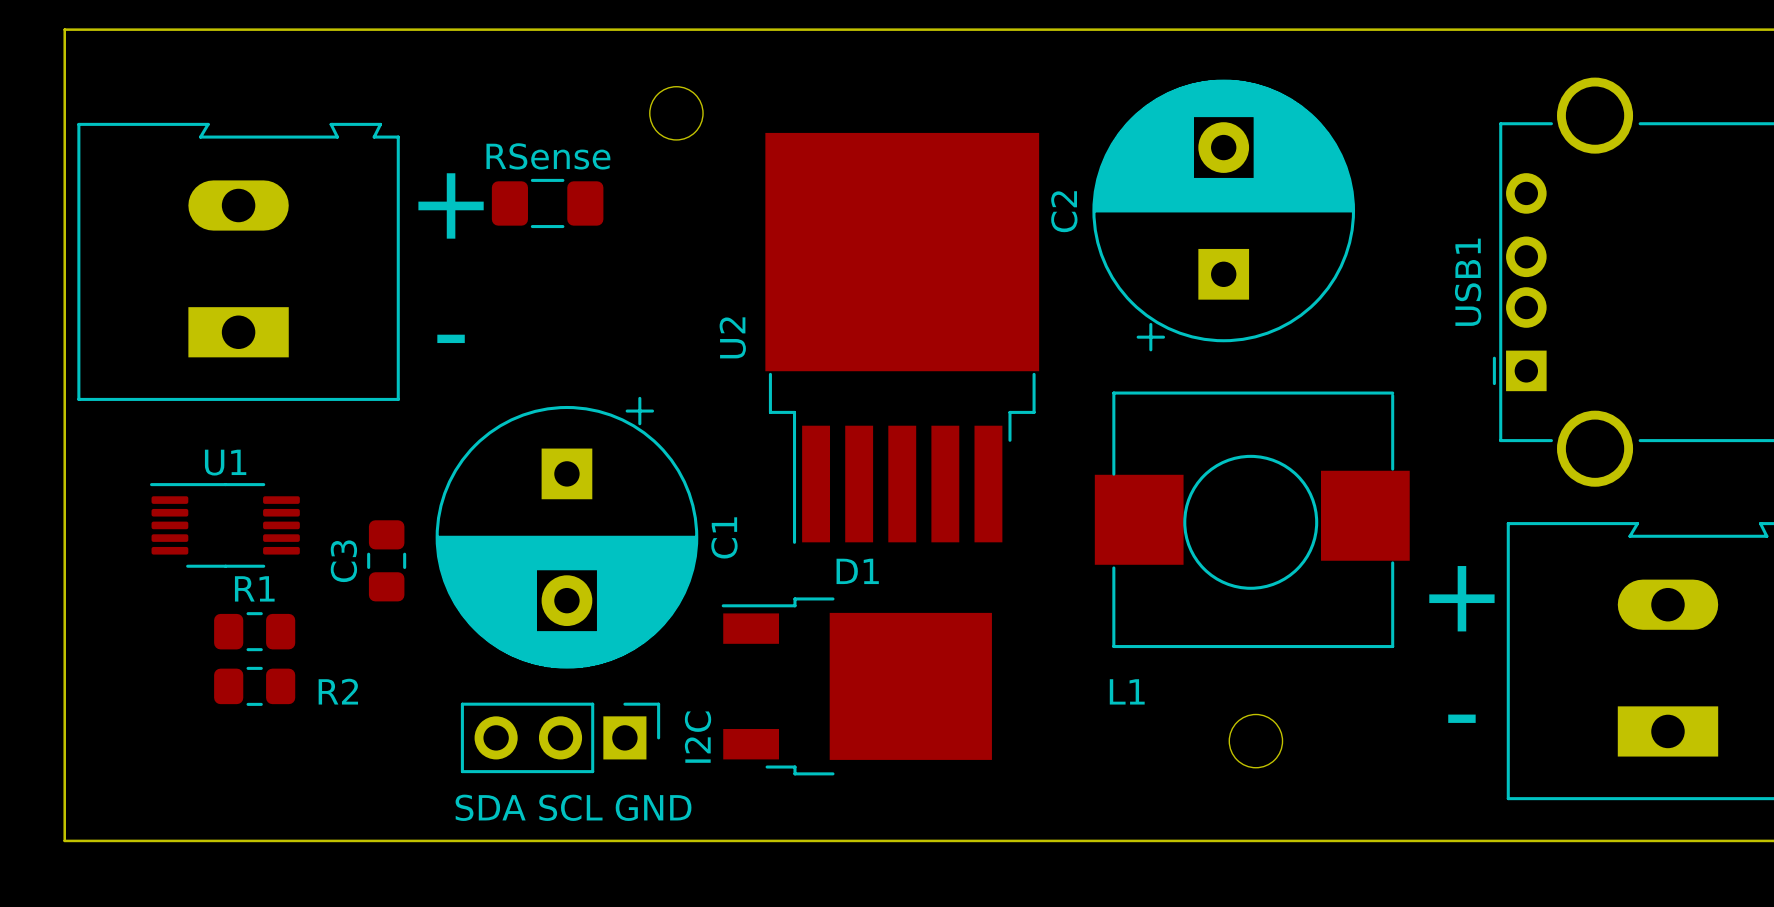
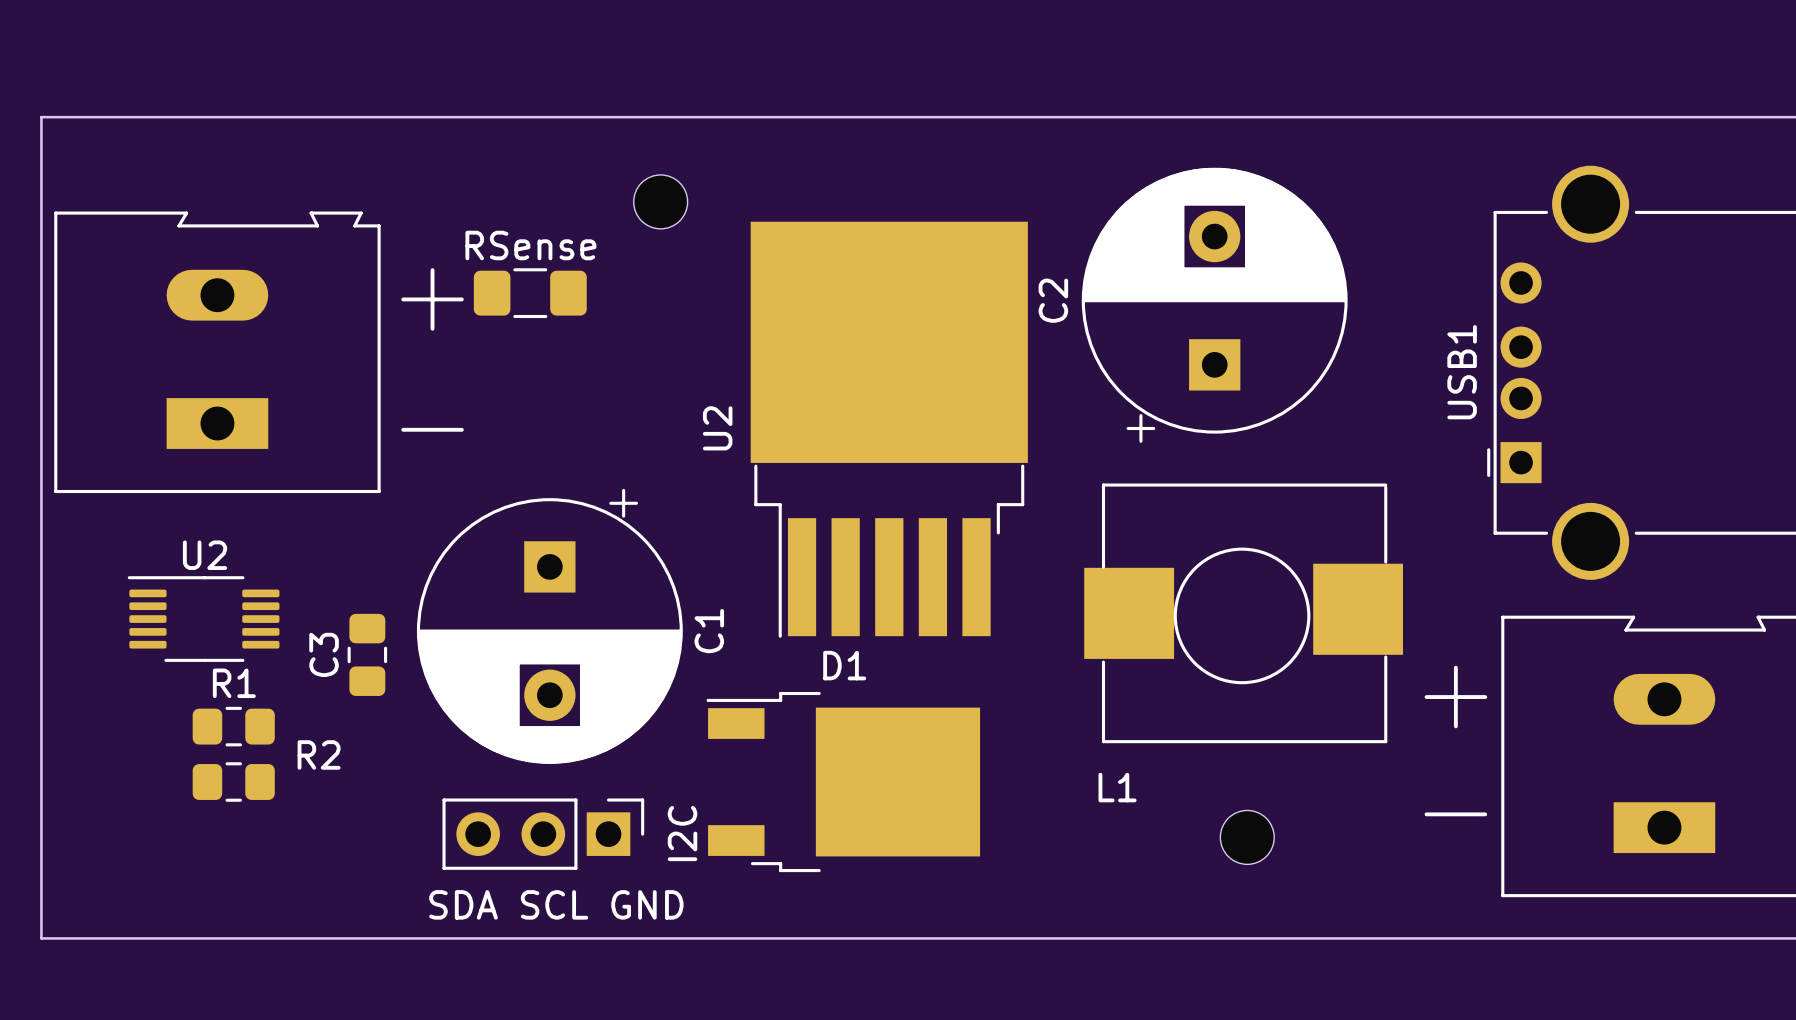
U1 name: U1 (225, 462) -> U2 (205, 555)
R2 name position: R2 (338, 691) -> R2 (319, 754)

